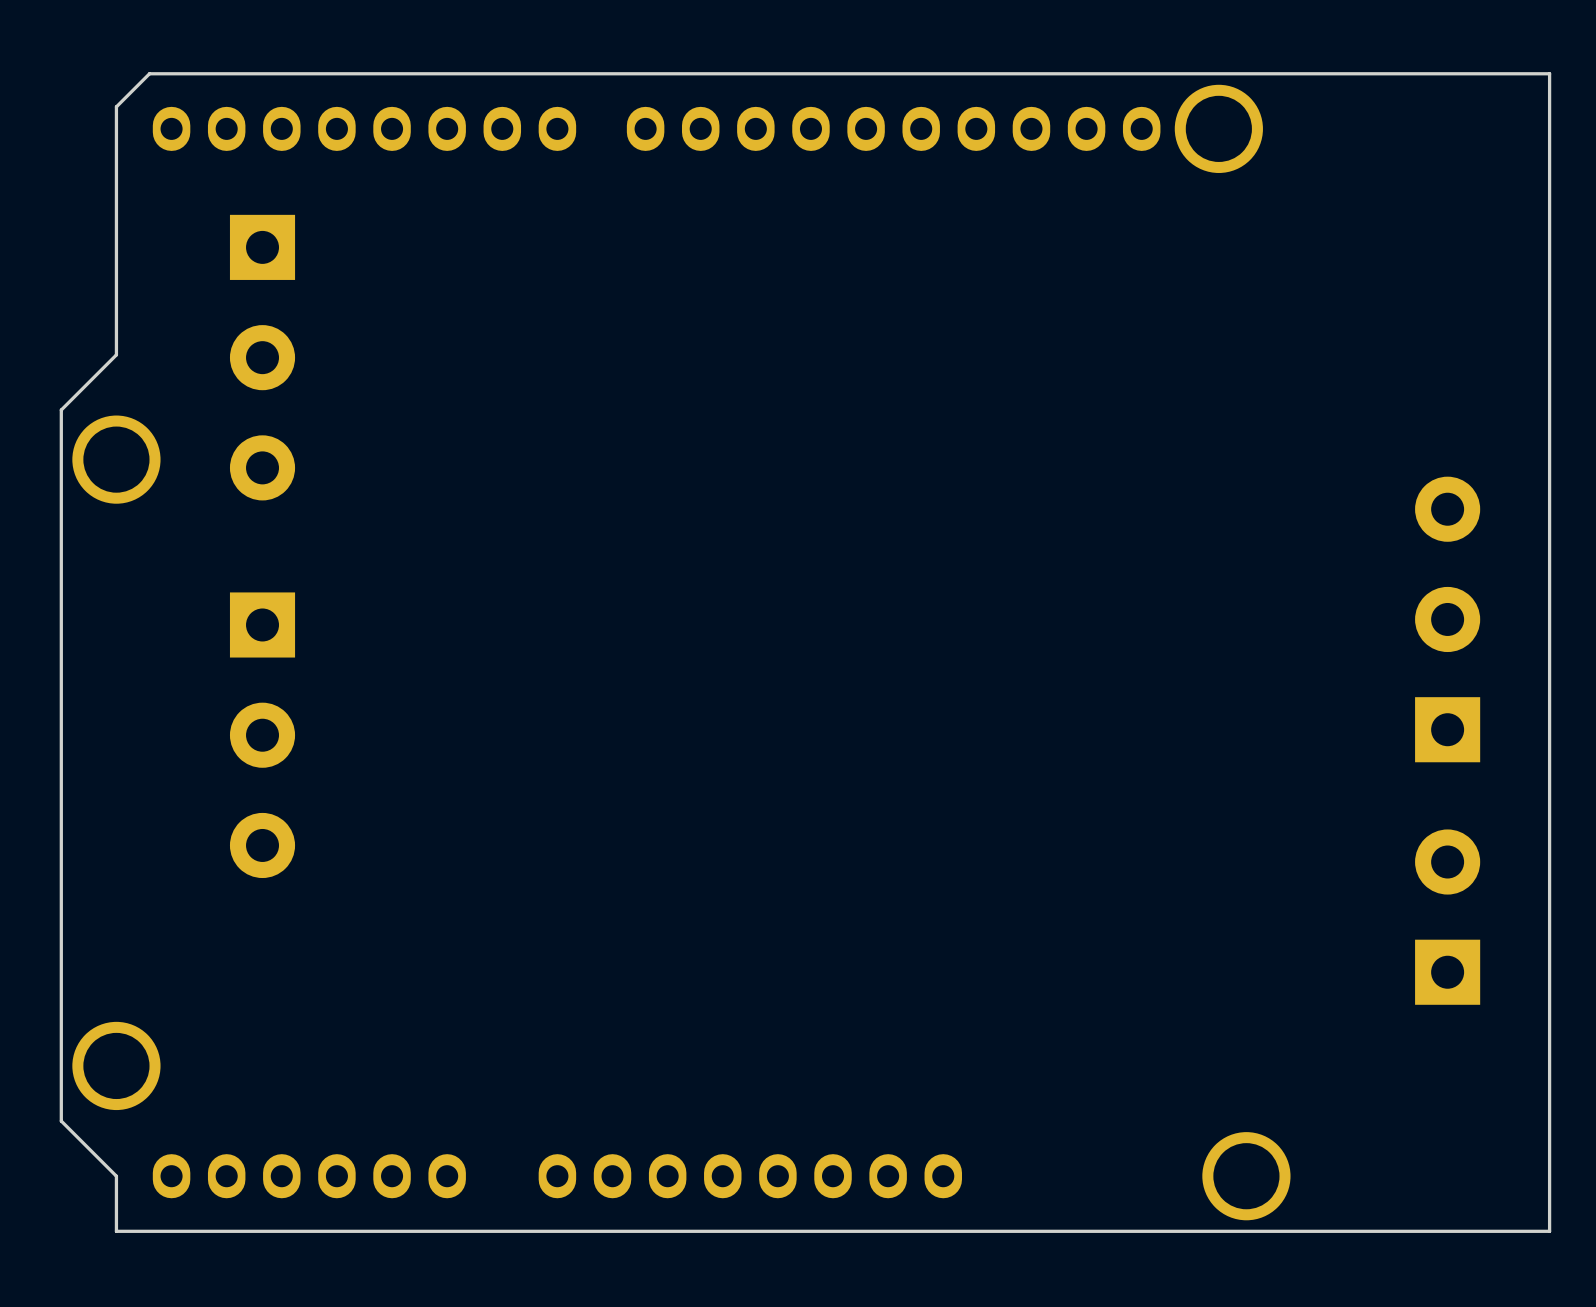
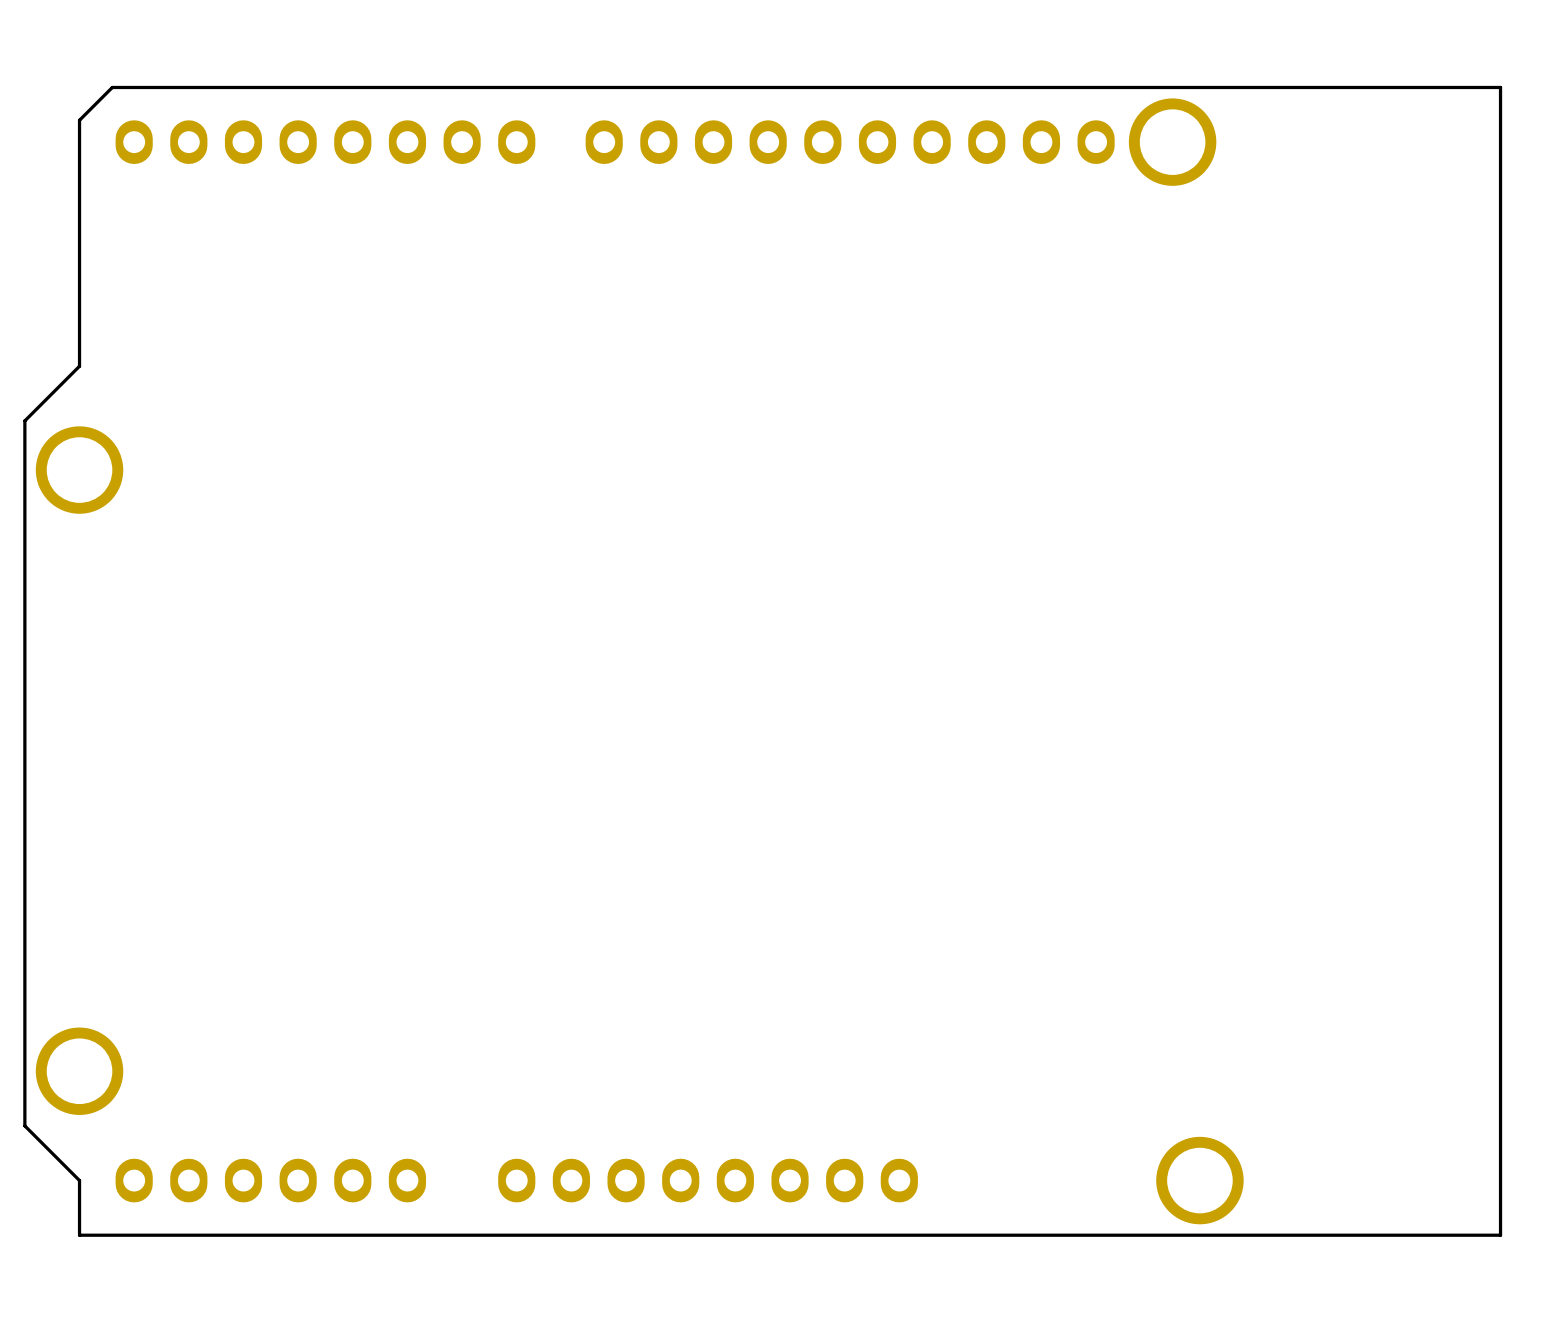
part: (262, 357) -> none
part: (1447, 619) -> none
part: (262, 735) -> none
part: (1447, 917) -> none

